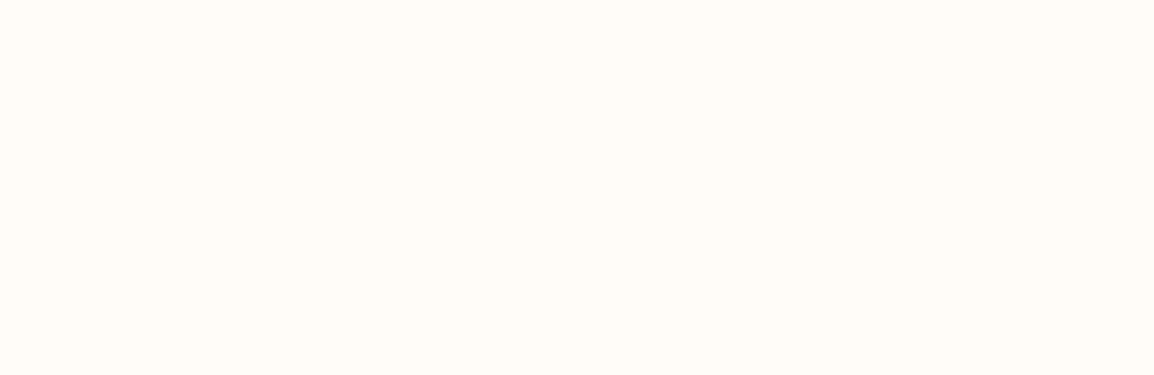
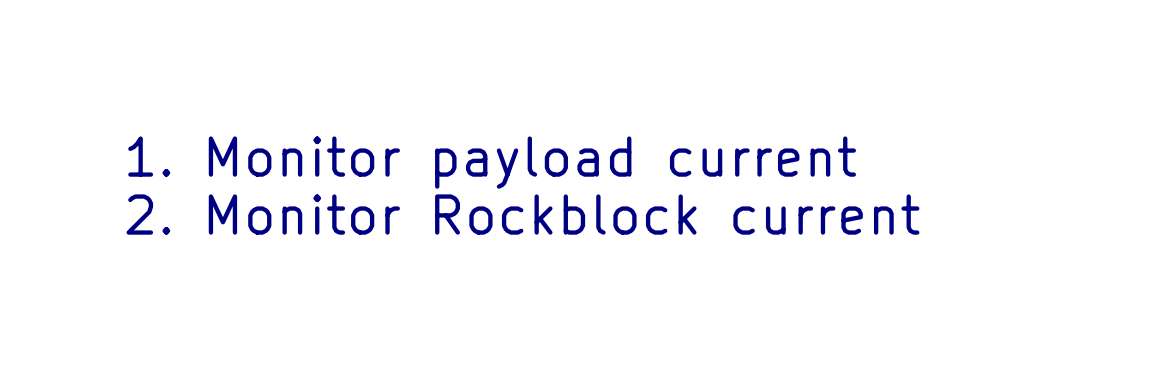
text: none -> 1. Monitor payload current (492, 162)
text: none -> 2. Monitor Rockblock current (522, 214)

